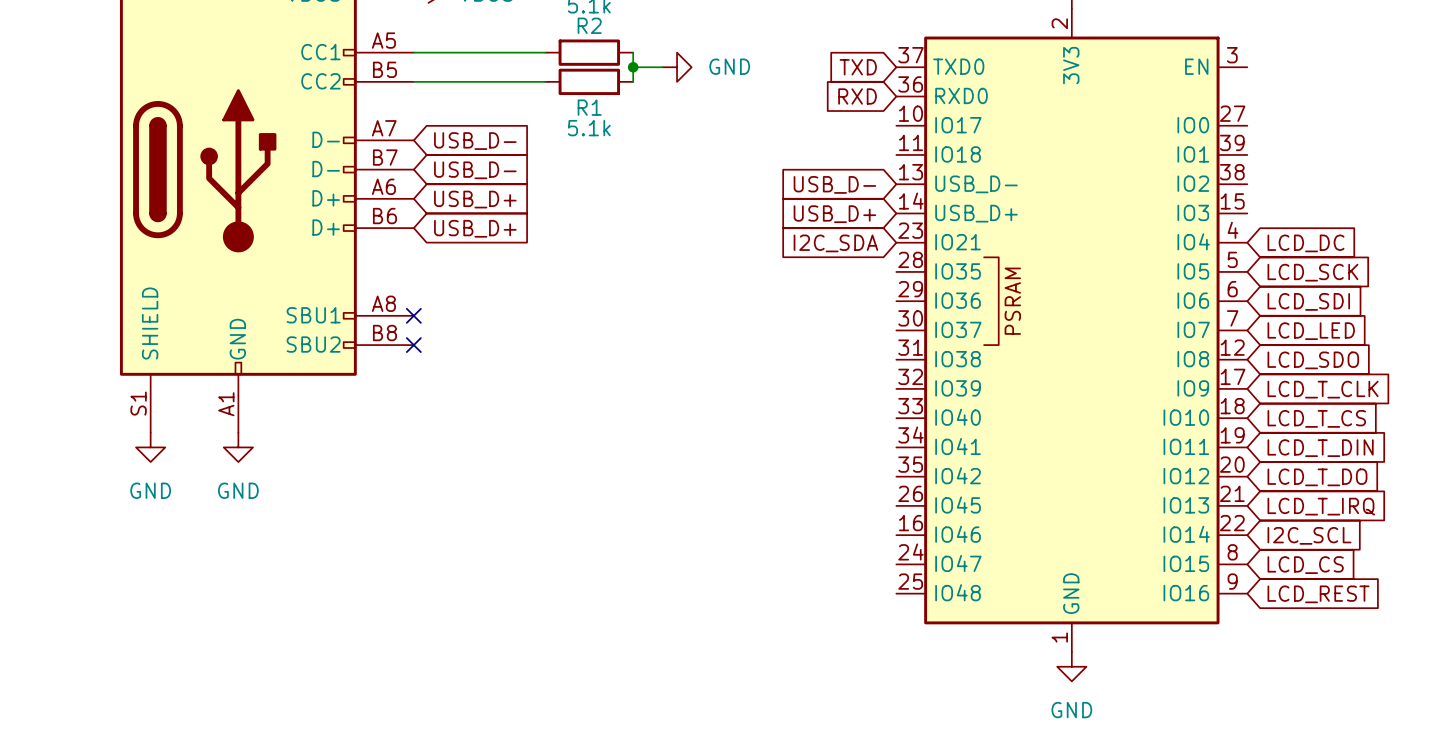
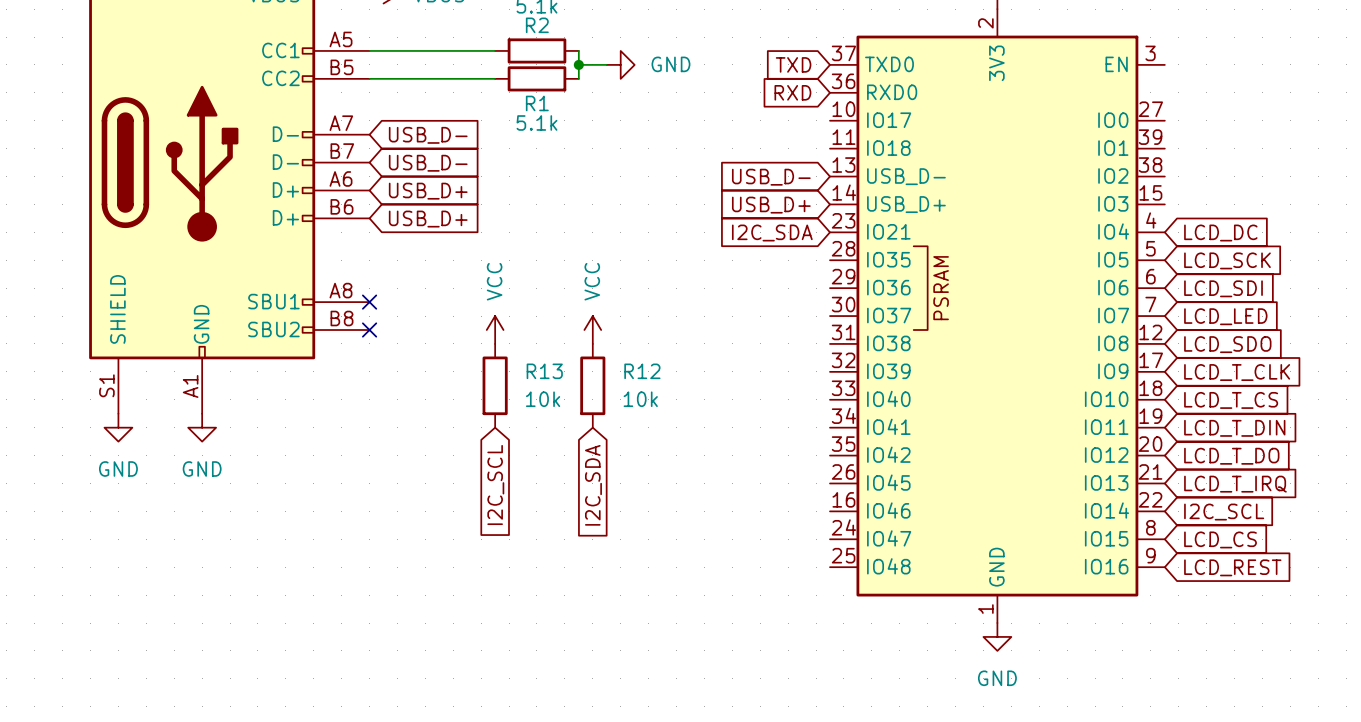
power symbol: none -> VCC (495, 330)
power symbol: none -> VCC (592, 330)
R13: none -> 10k (495, 385)
R12: none -> 10k (592, 385)
global label: none -> I2C_SCL (495, 484)
global label: none -> I2C_SDA (593, 485)

